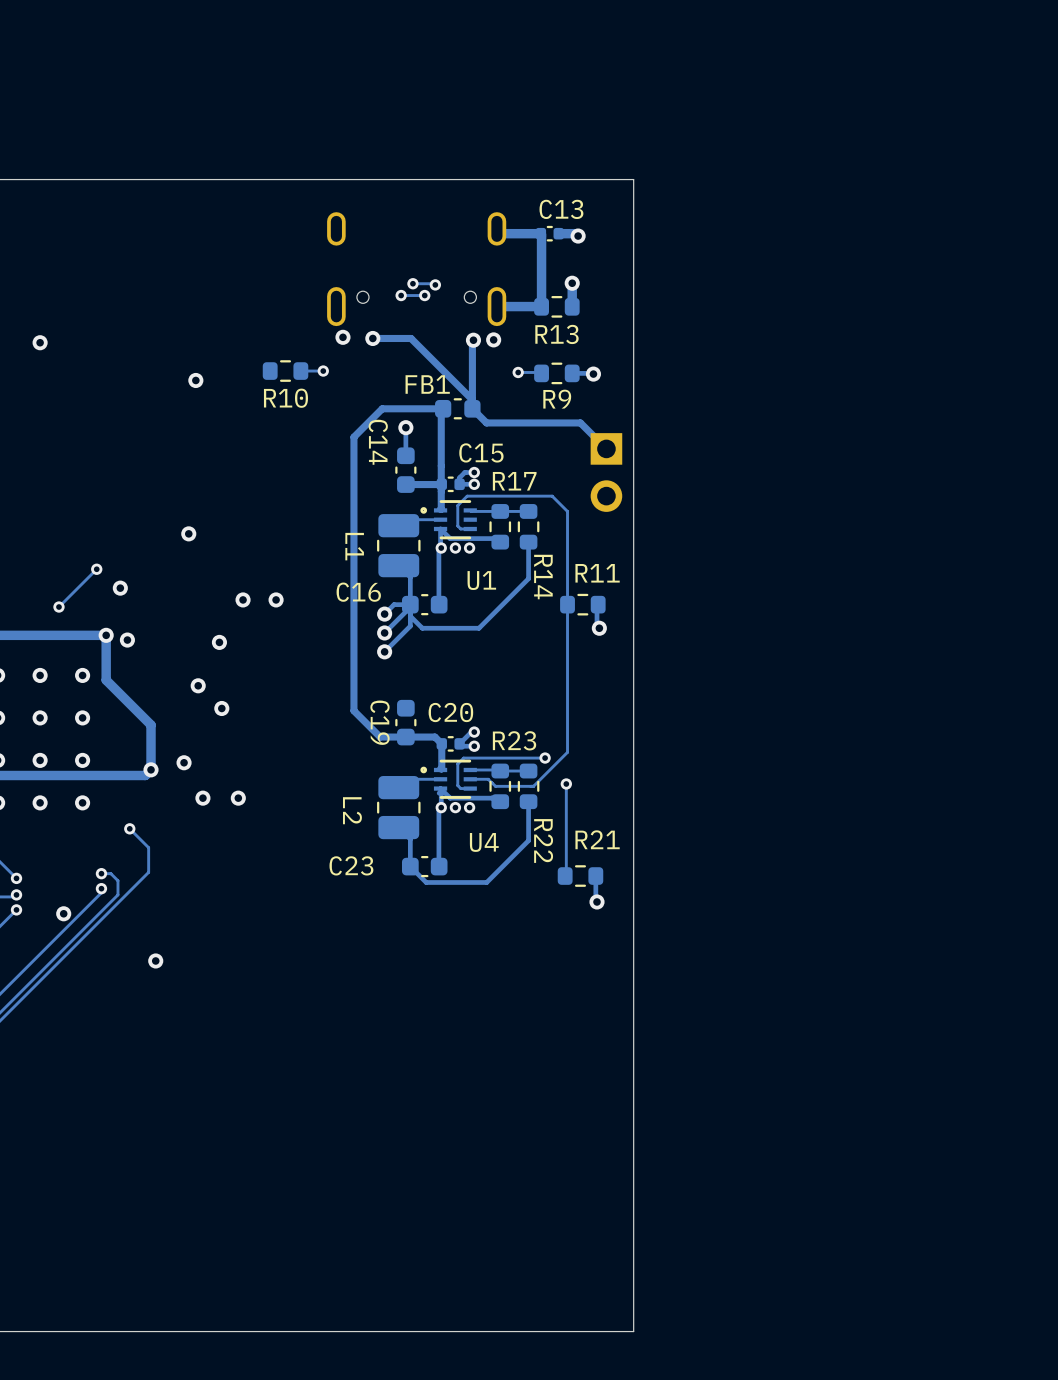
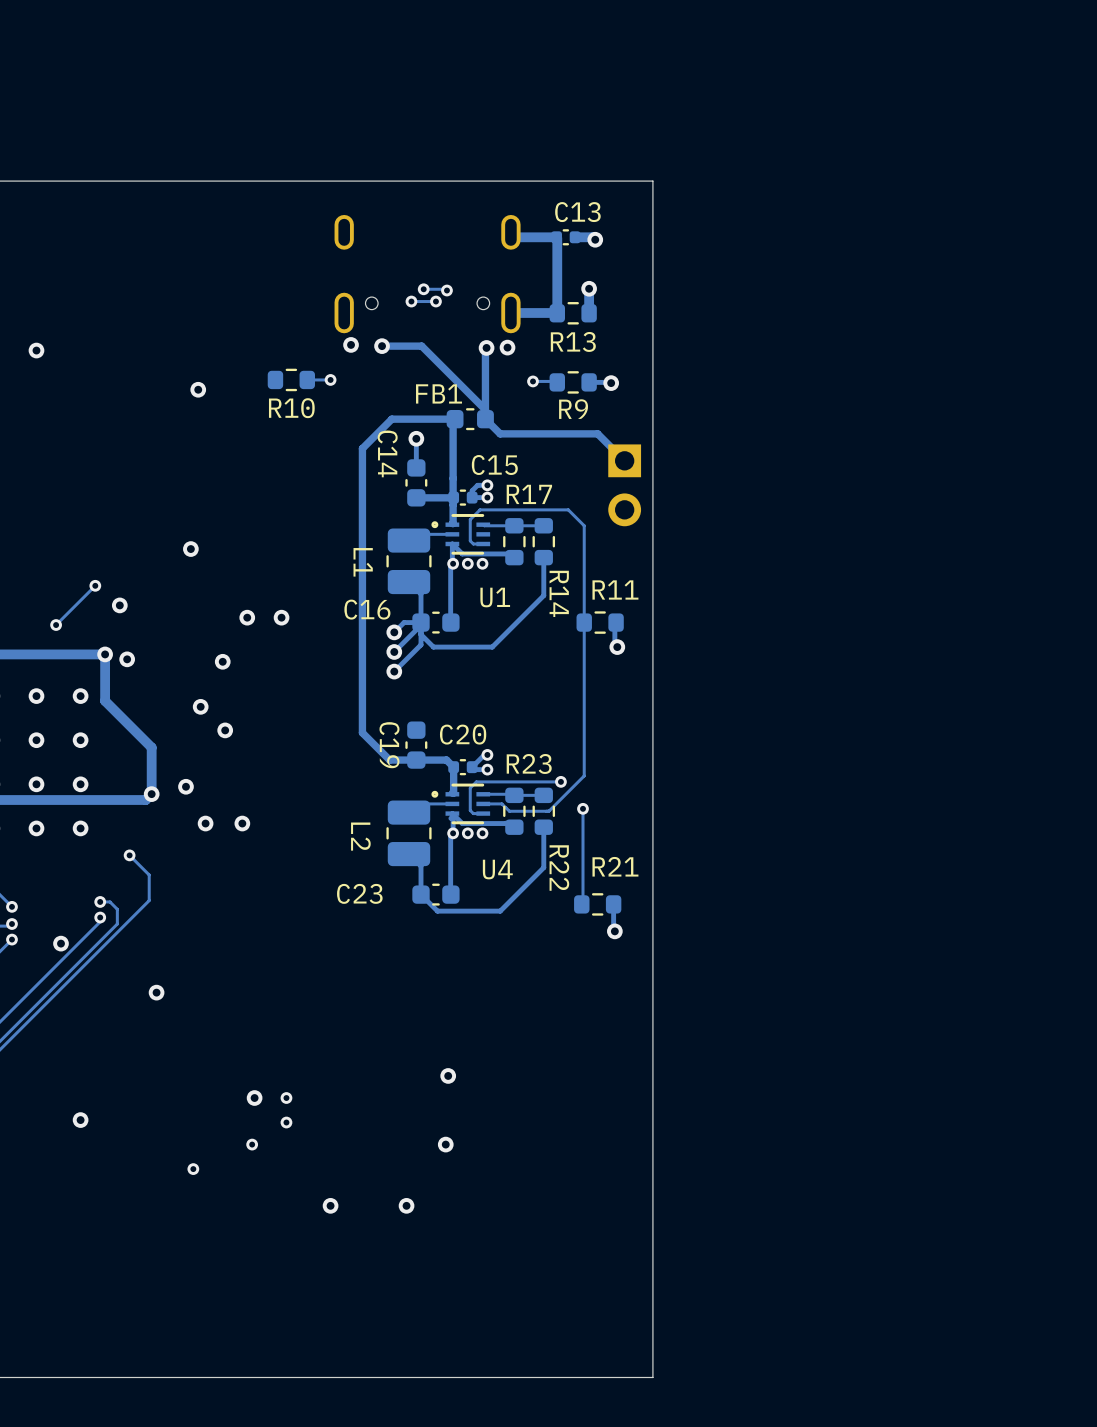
via: none -> (448, 1075)
via: none -> (254, 1098)
via: none -> (286, 1098)
via: none -> (80, 1120)
via: none -> (286, 1122)
via: none -> (252, 1144)
via: none -> (445, 1144)
via: none -> (193, 1169)
via: none -> (330, 1205)
via: none -> (406, 1205)

